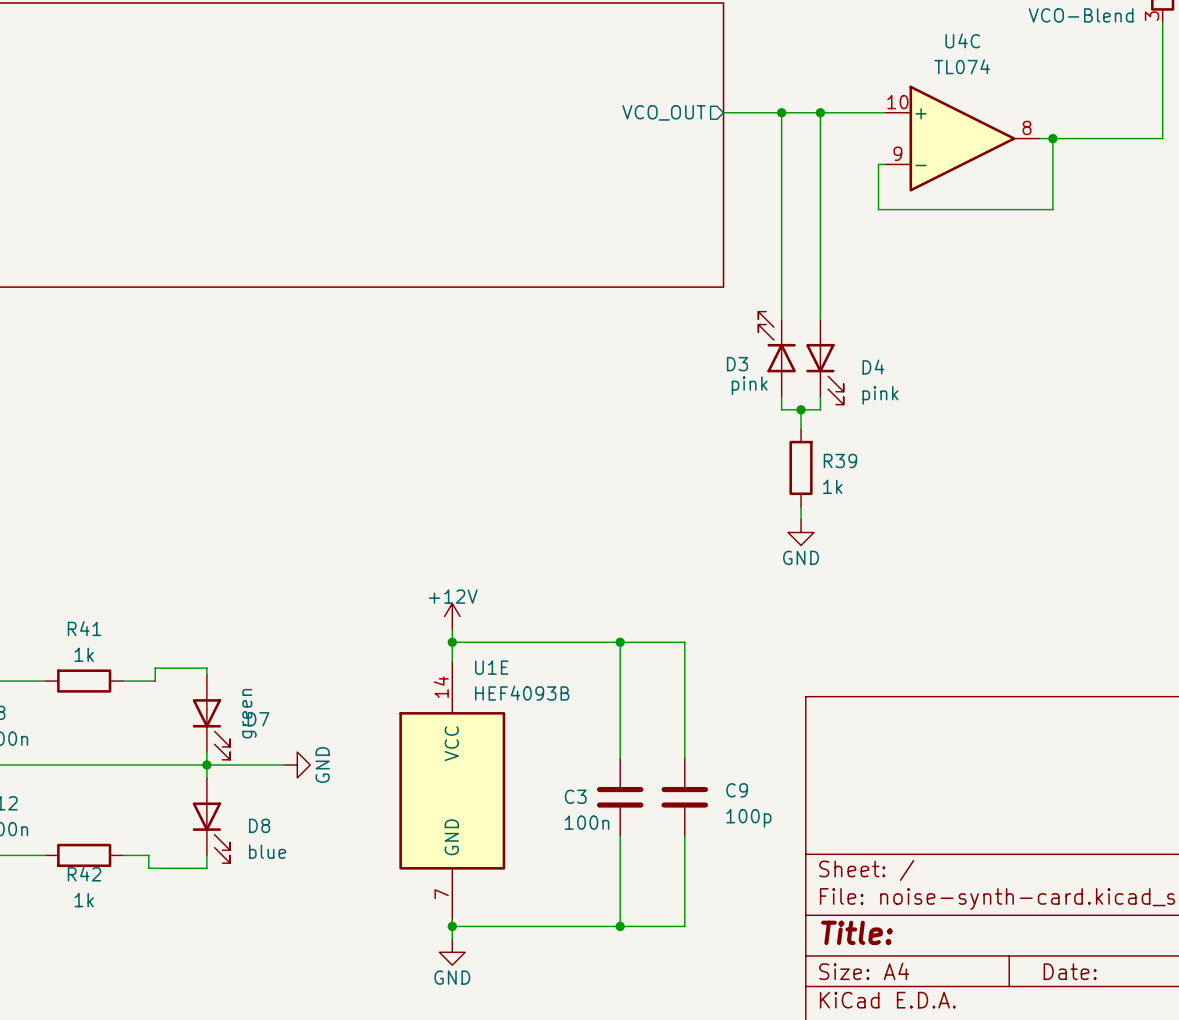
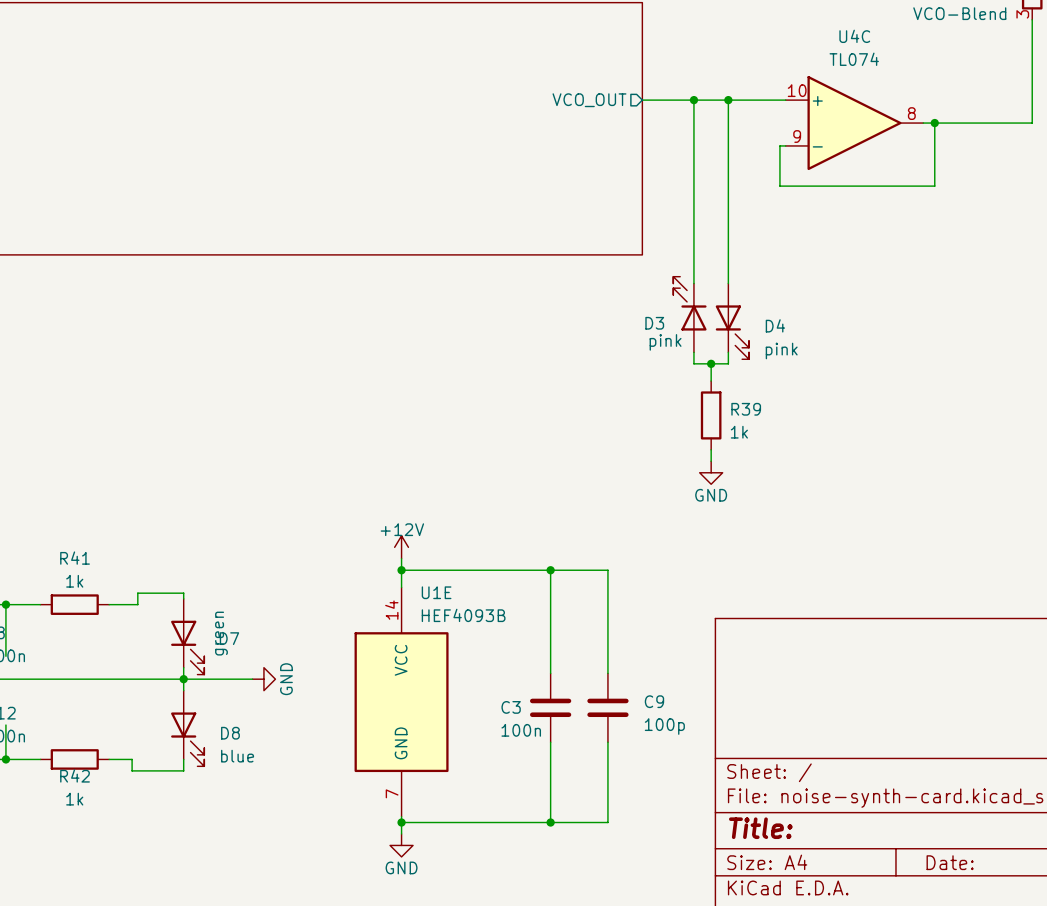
wire: none -> (5, 604) (5, 656)
junction: none -> (5, 604)
wire: none -> (5, 725) (5, 759)
junction: none -> (5, 759)

